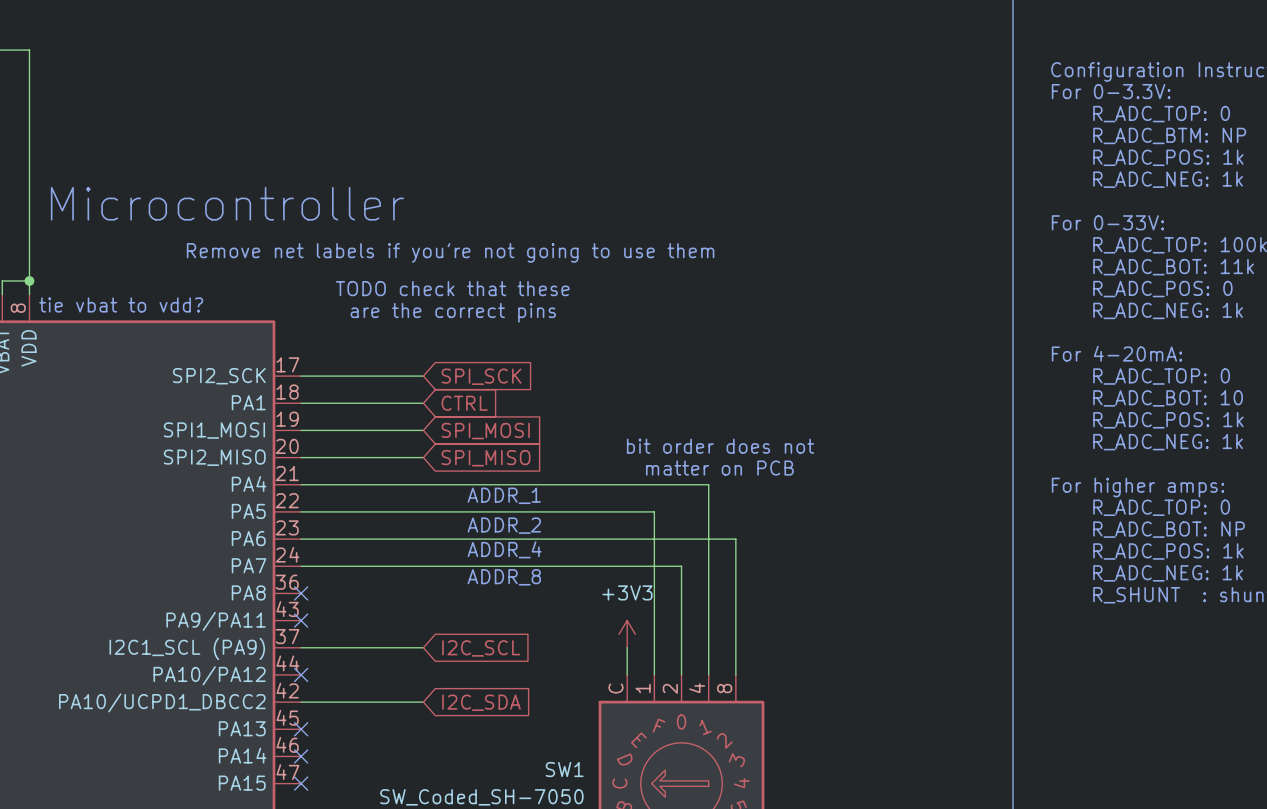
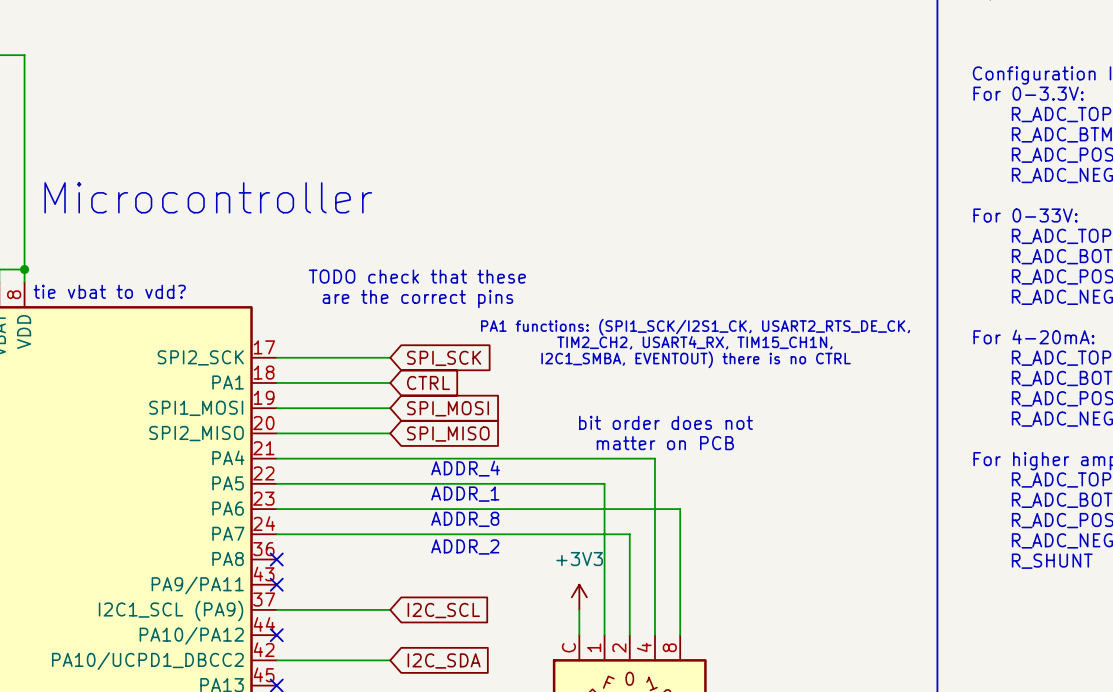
text: Remove net labels if you're not going to use them (450, 252) -> none
text: none -> PA1 functions: (SPI1_SCK/I2S1_CK, USART2_RTS_DE_CK, (695, 327)
text: none -> TIM2_CH2, USART4_RX, TIM15_CH1N, (694, 342)
text: none -> I2C1_SMBA, EVENTOUT) there is no CTRL (696, 359)
text: ADDR_1 (504, 495) -> ADDR_4 (465, 468)
text: ADDR_2 (504, 525) -> ADDR_1 (465, 494)
text: ADDR_4 (504, 549) -> ADDR_8 (465, 519)
text: ADDR_8 (504, 577) -> ADDR_2 (465, 547)

